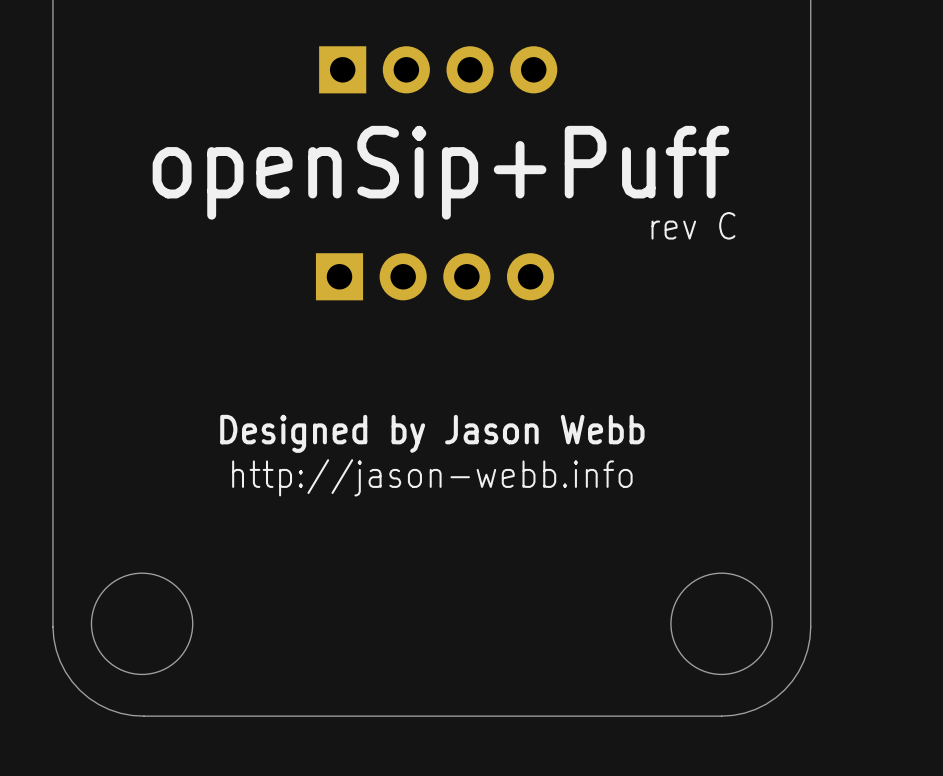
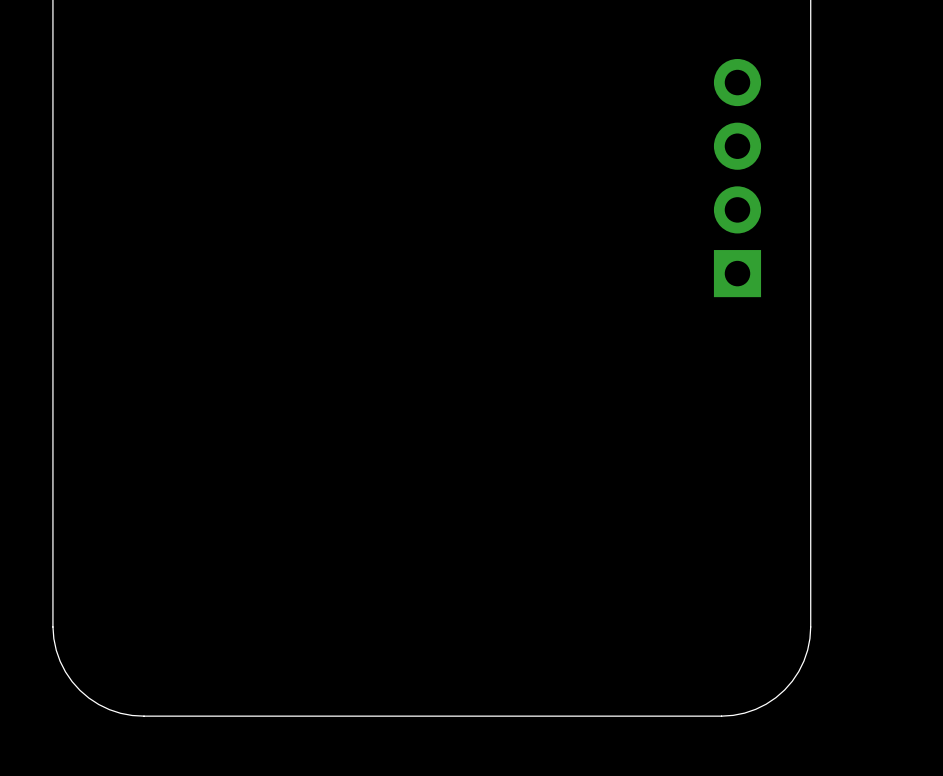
part: (438, 69) -> none
text: openSip+Puff (440, 172) -> none
part: none -> (737, 178)
text: rev C (693, 225) -> none
part: (435, 276) -> none
text: Designed by Jason Webb (432, 433) -> none
text: http://jason-webb.info (432, 477) -> none
drawing: [91, 572, 773, 675] -> none

